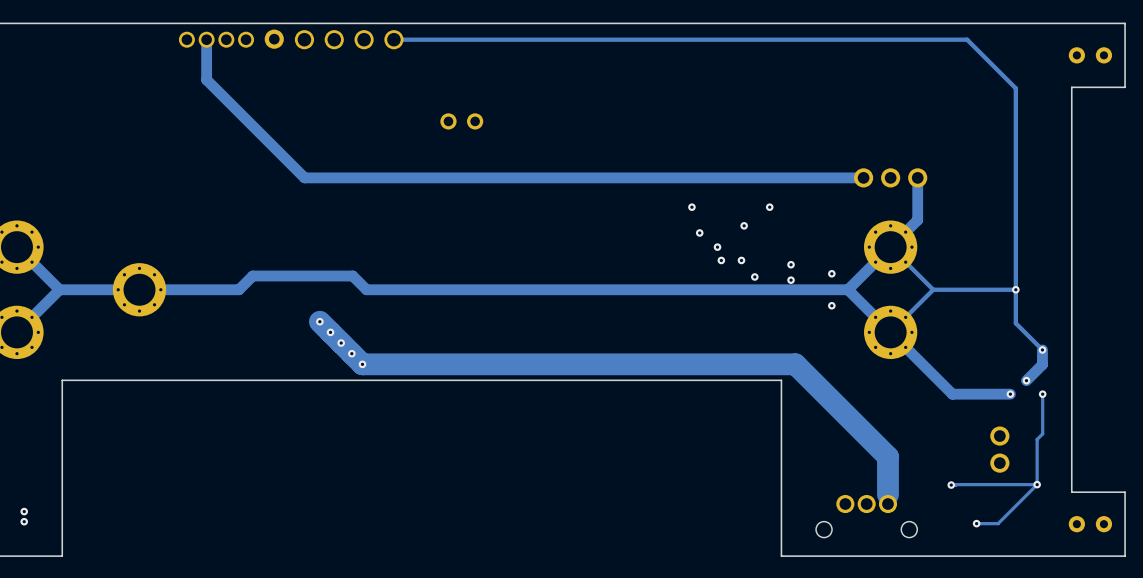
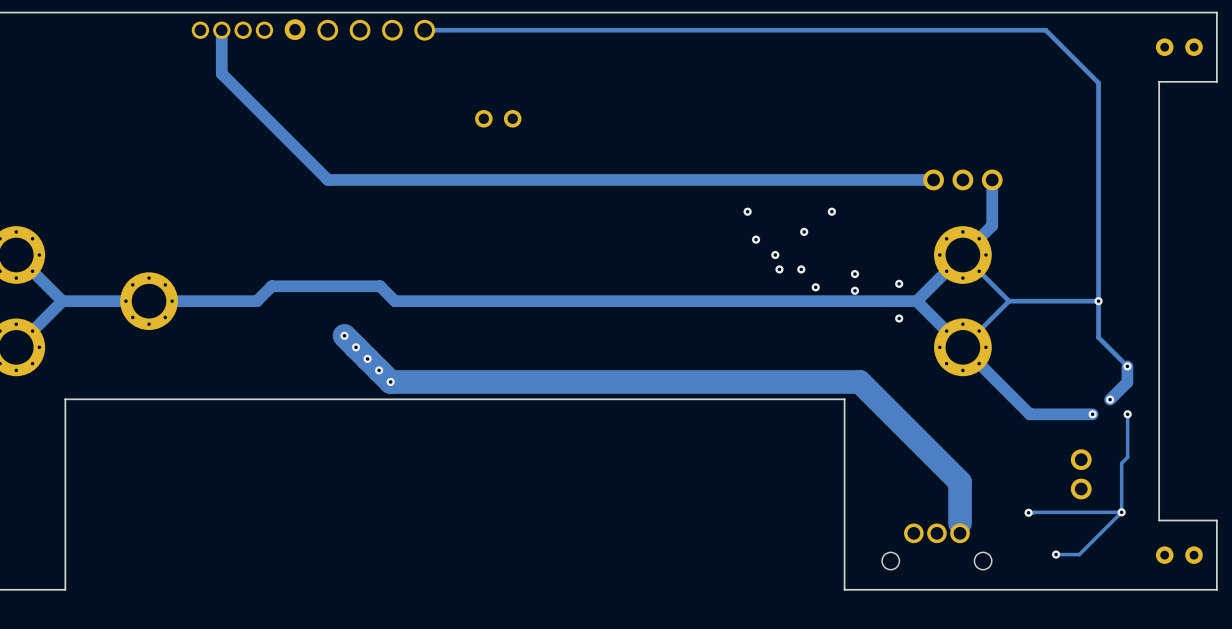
via: (24, 511) -> none
via: (24, 521) -> none

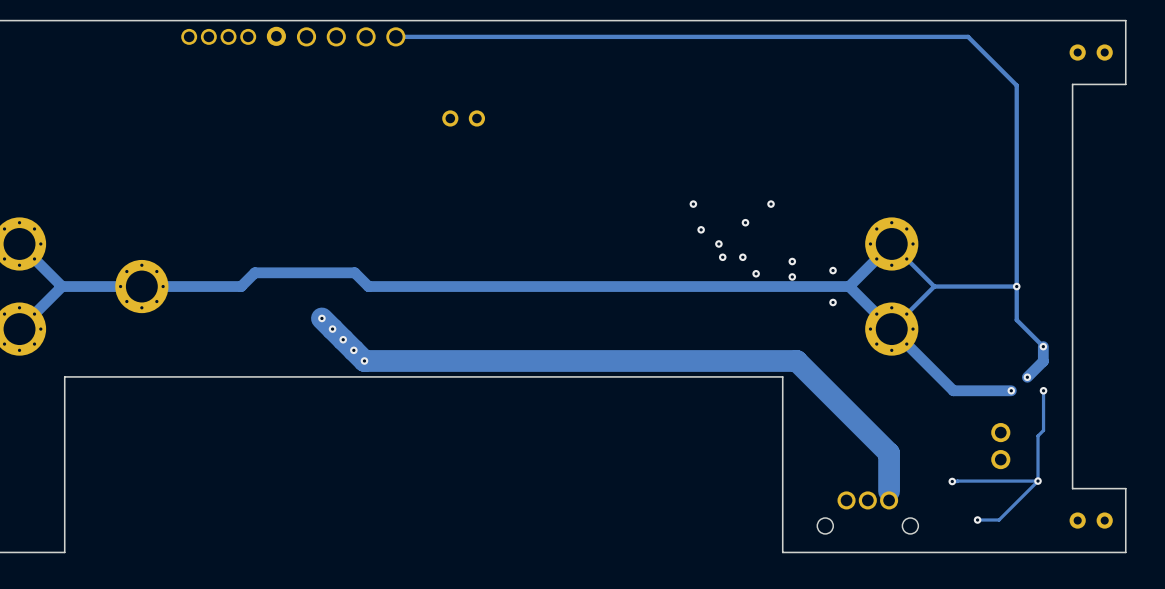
track: (221, 30) (221, 73) (327, 179) (933, 179) -> none
part: (962, 179) -> none
track: (992, 179) (992, 225) (962, 254) -> none

